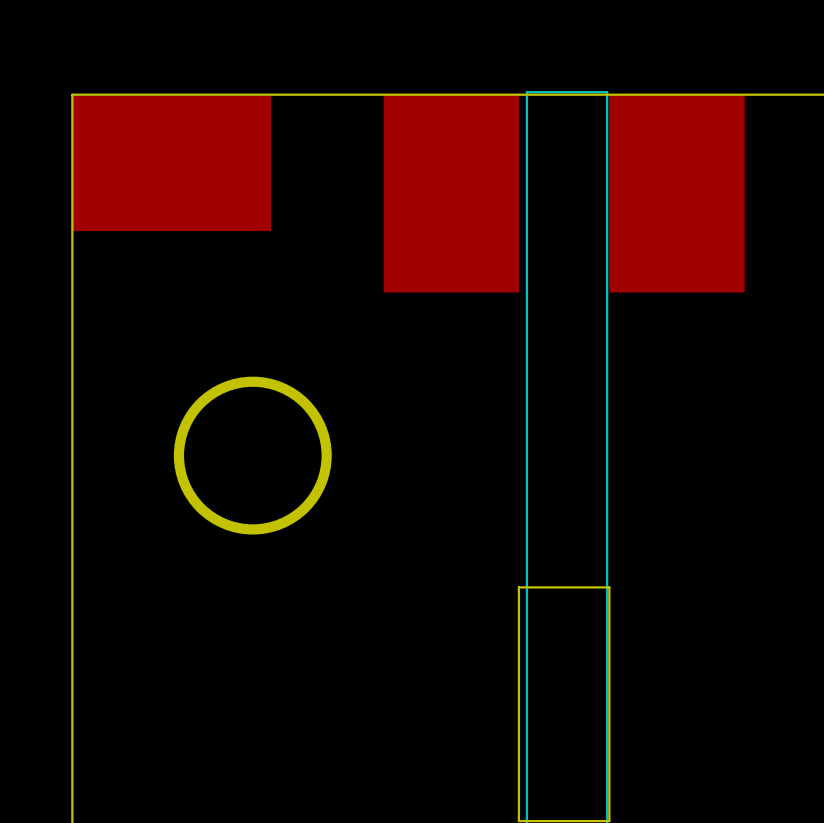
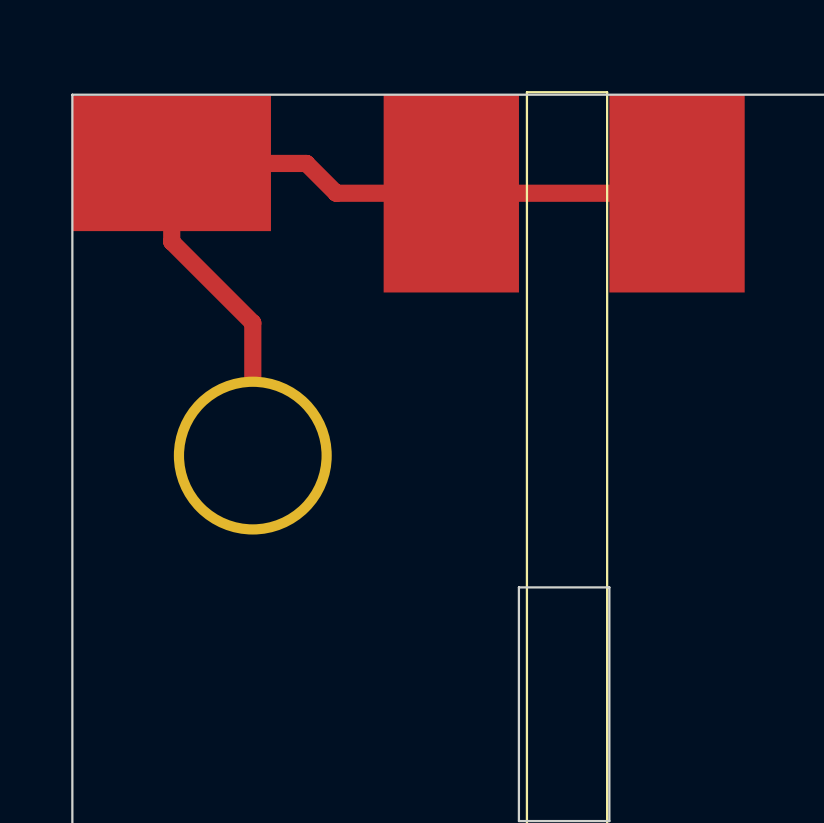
track: none -> (677, 193) (336, 193) (306, 163) (171, 163) (171, 241) (252, 322) (252, 455)

